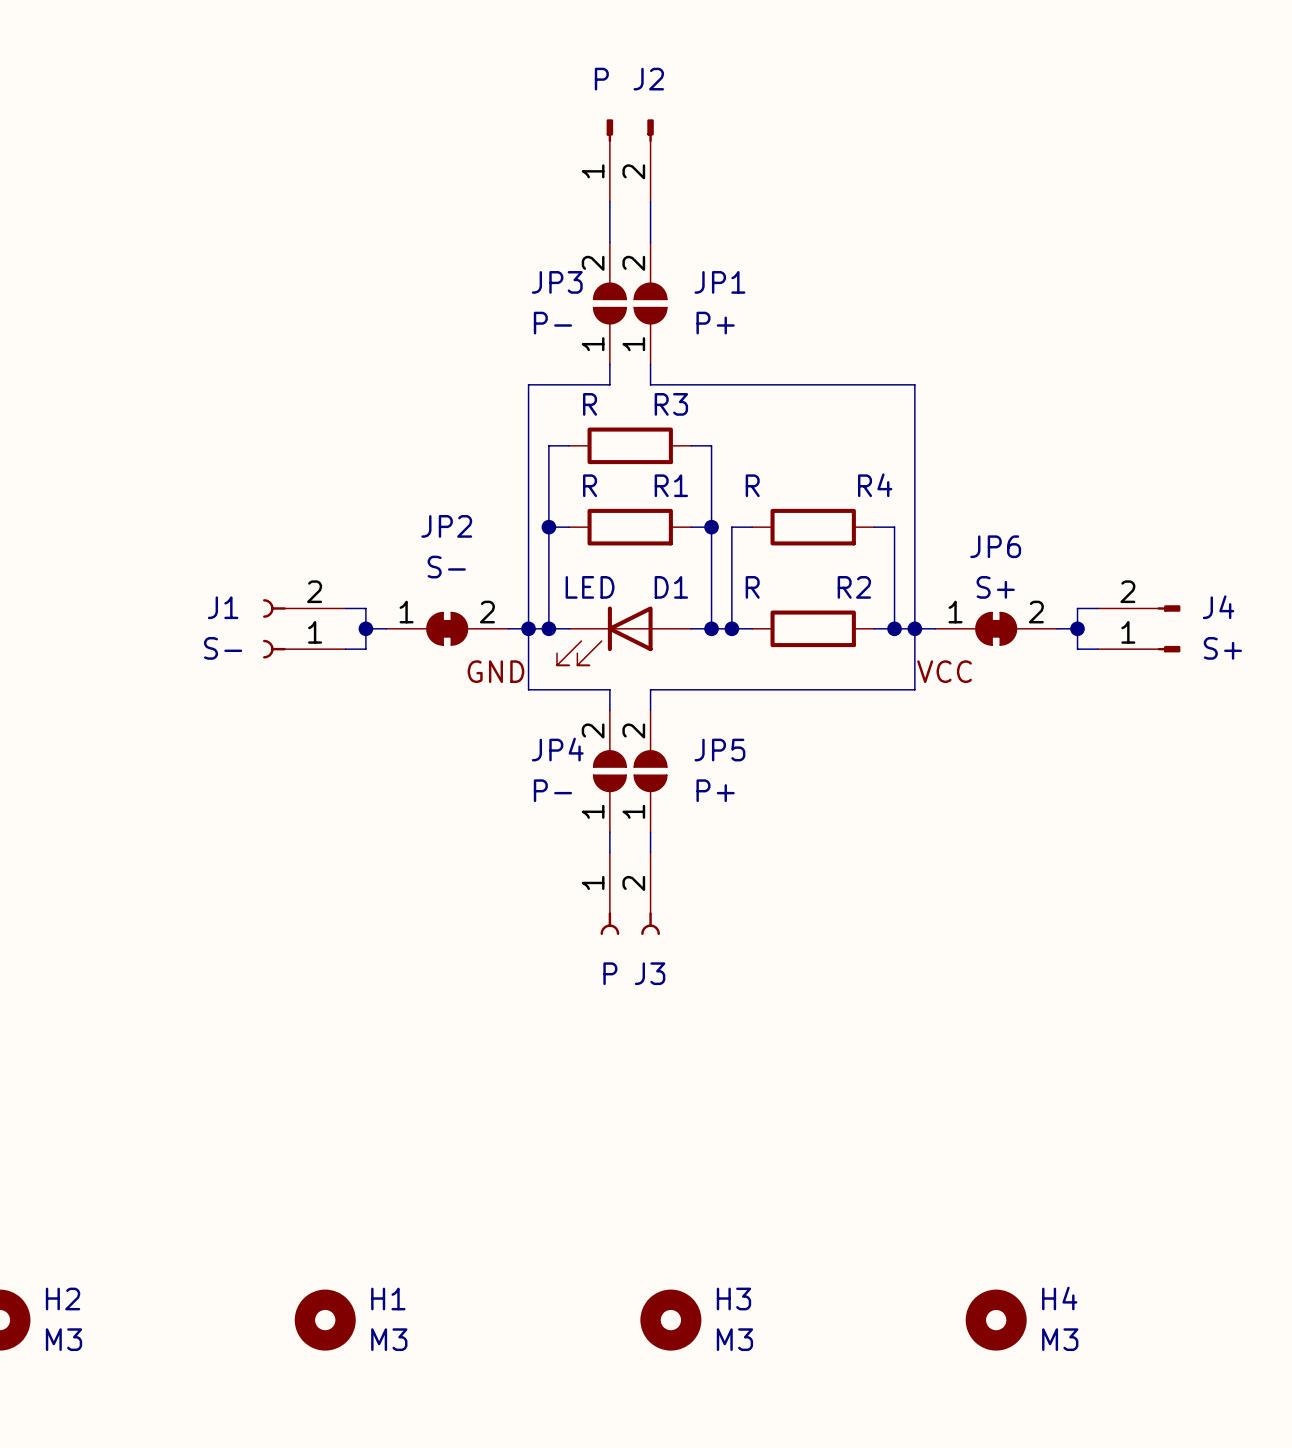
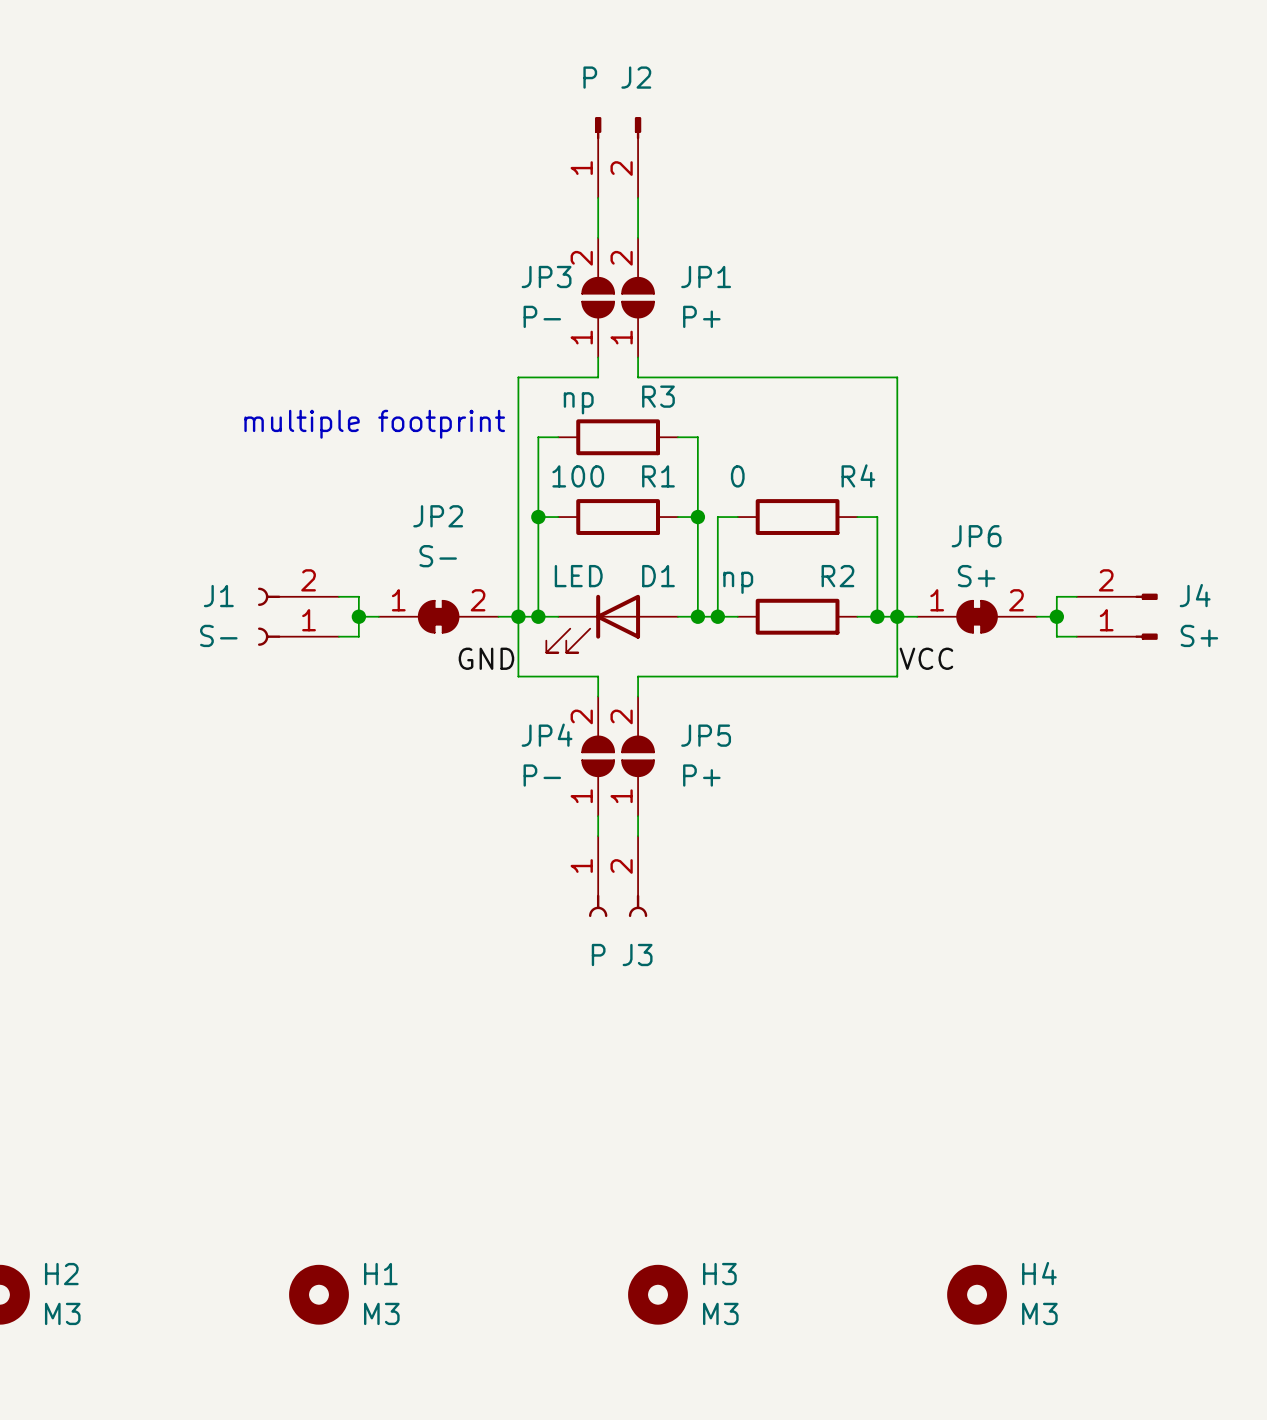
R3 value: R (590, 404) -> np (578, 403)
text: none -> multiple footprint (374, 424)
R1 value: R (590, 485) -> 100 (578, 476)
R4 value: R (752, 485) -> 0 (737, 476)
R2 value: R (752, 587) -> np (738, 582)

